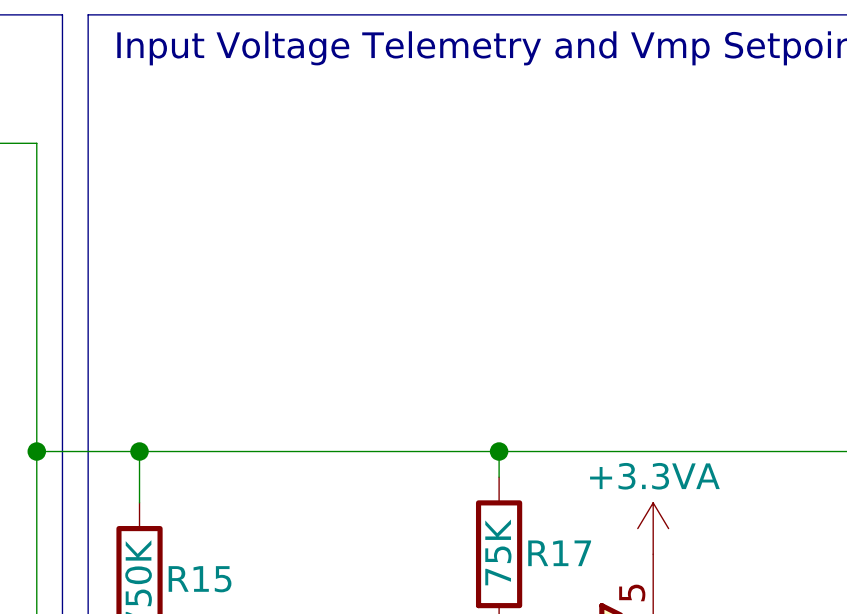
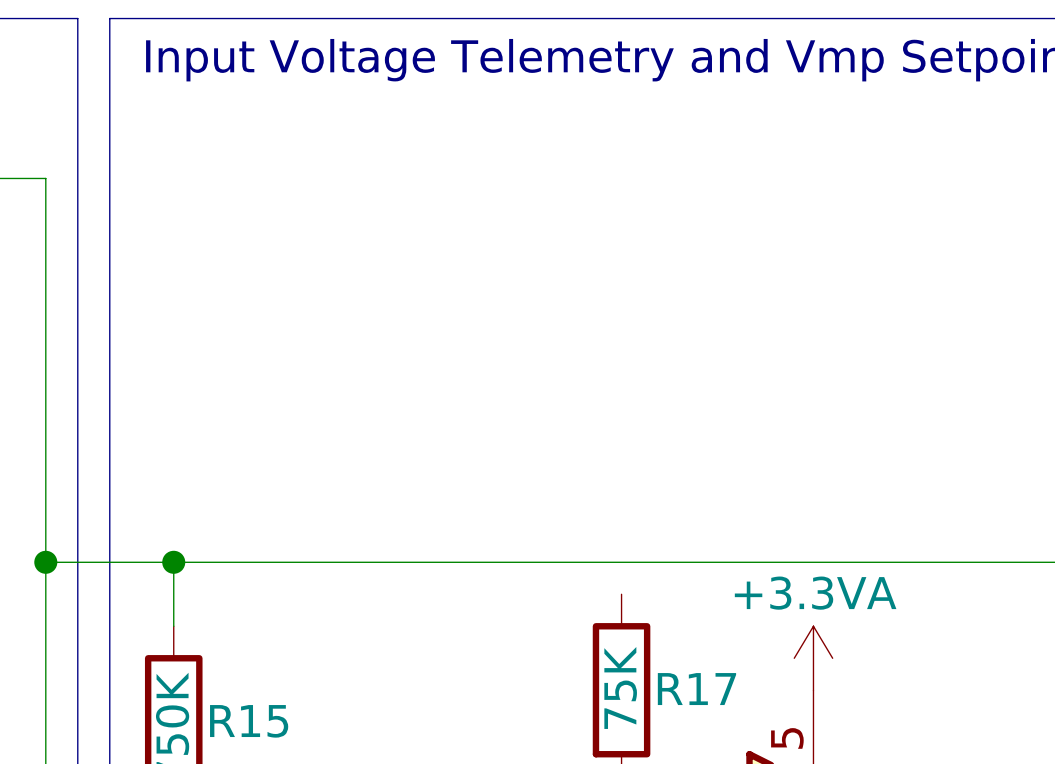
wire: (499, 451) (499, 477) -> none
junction: (499, 451) -> none

